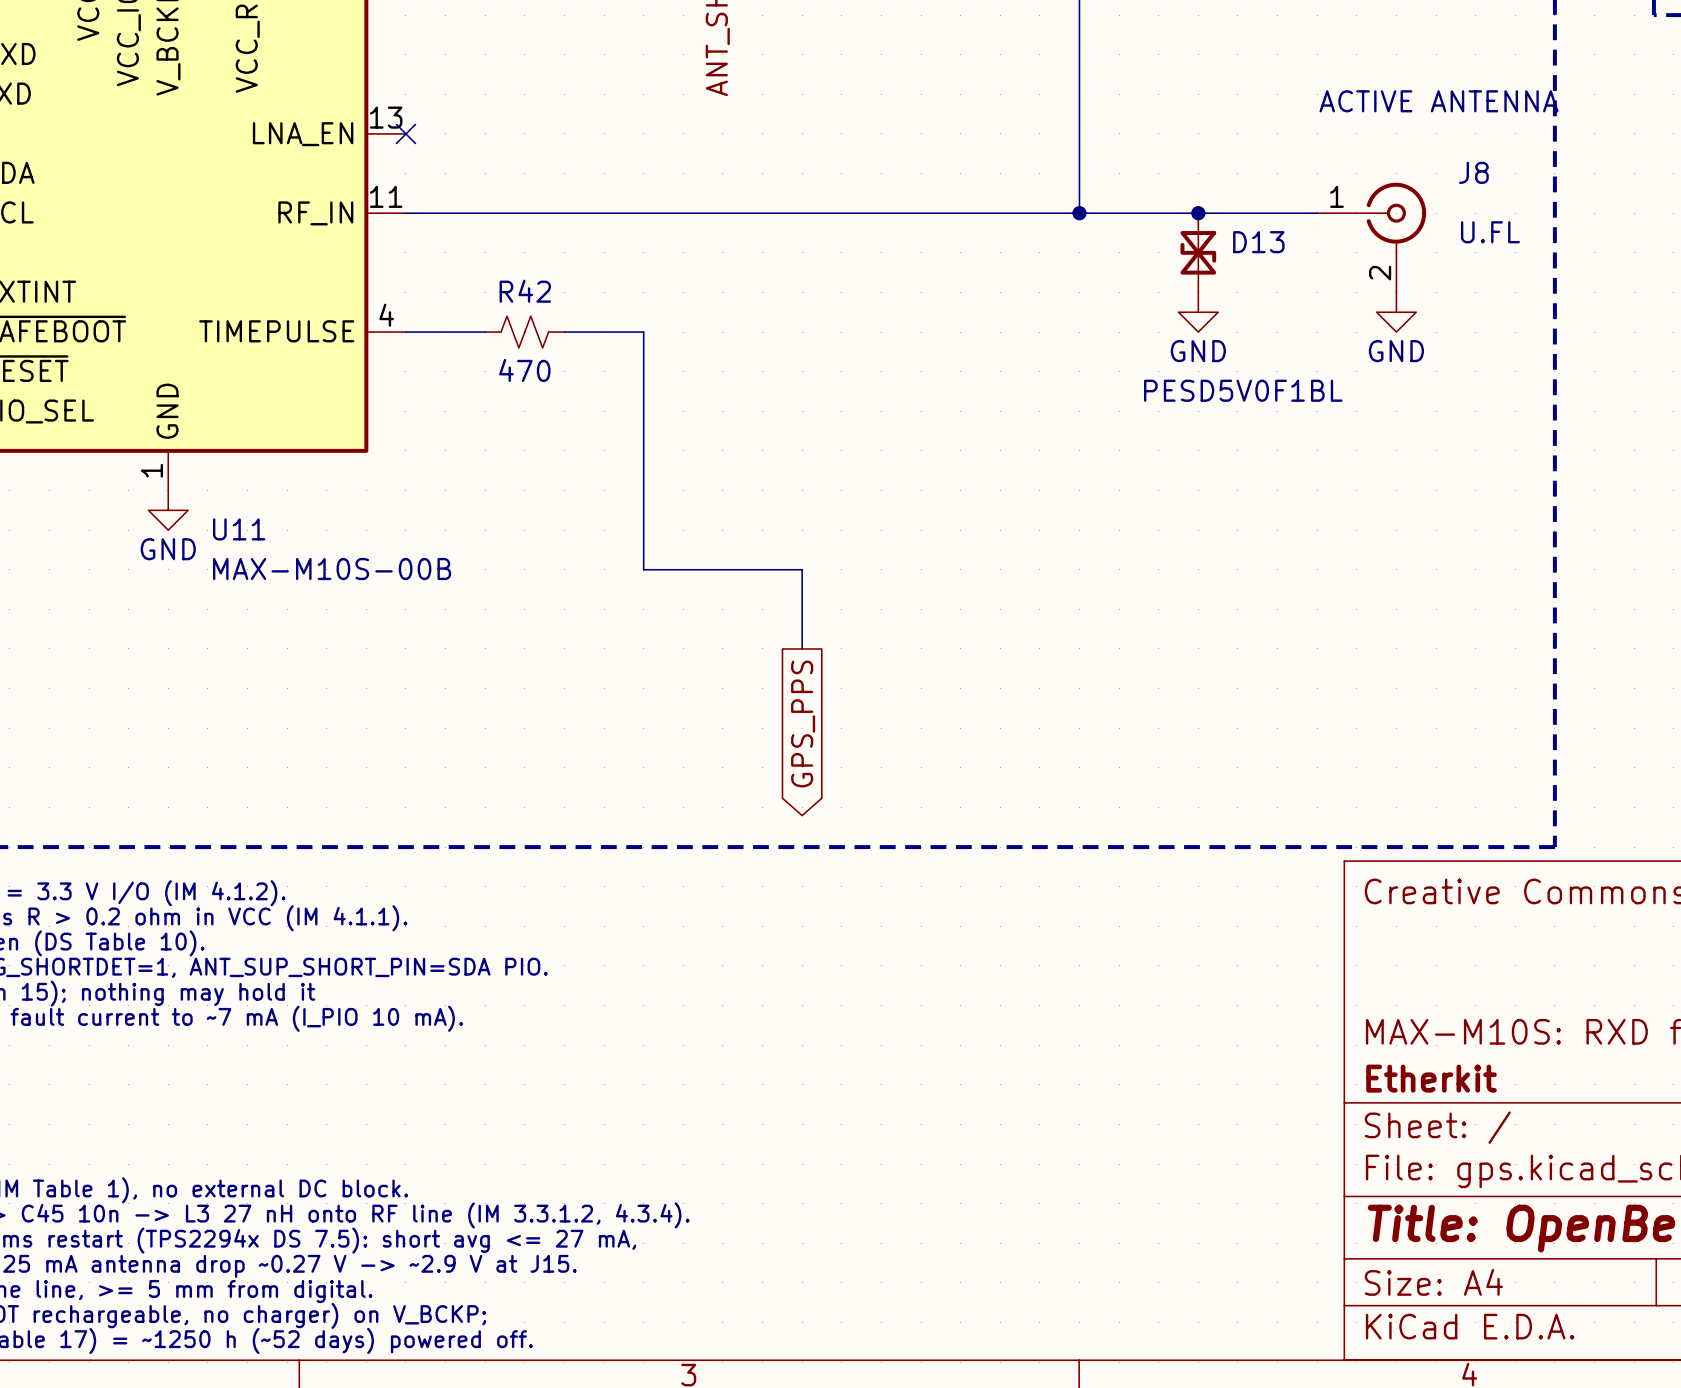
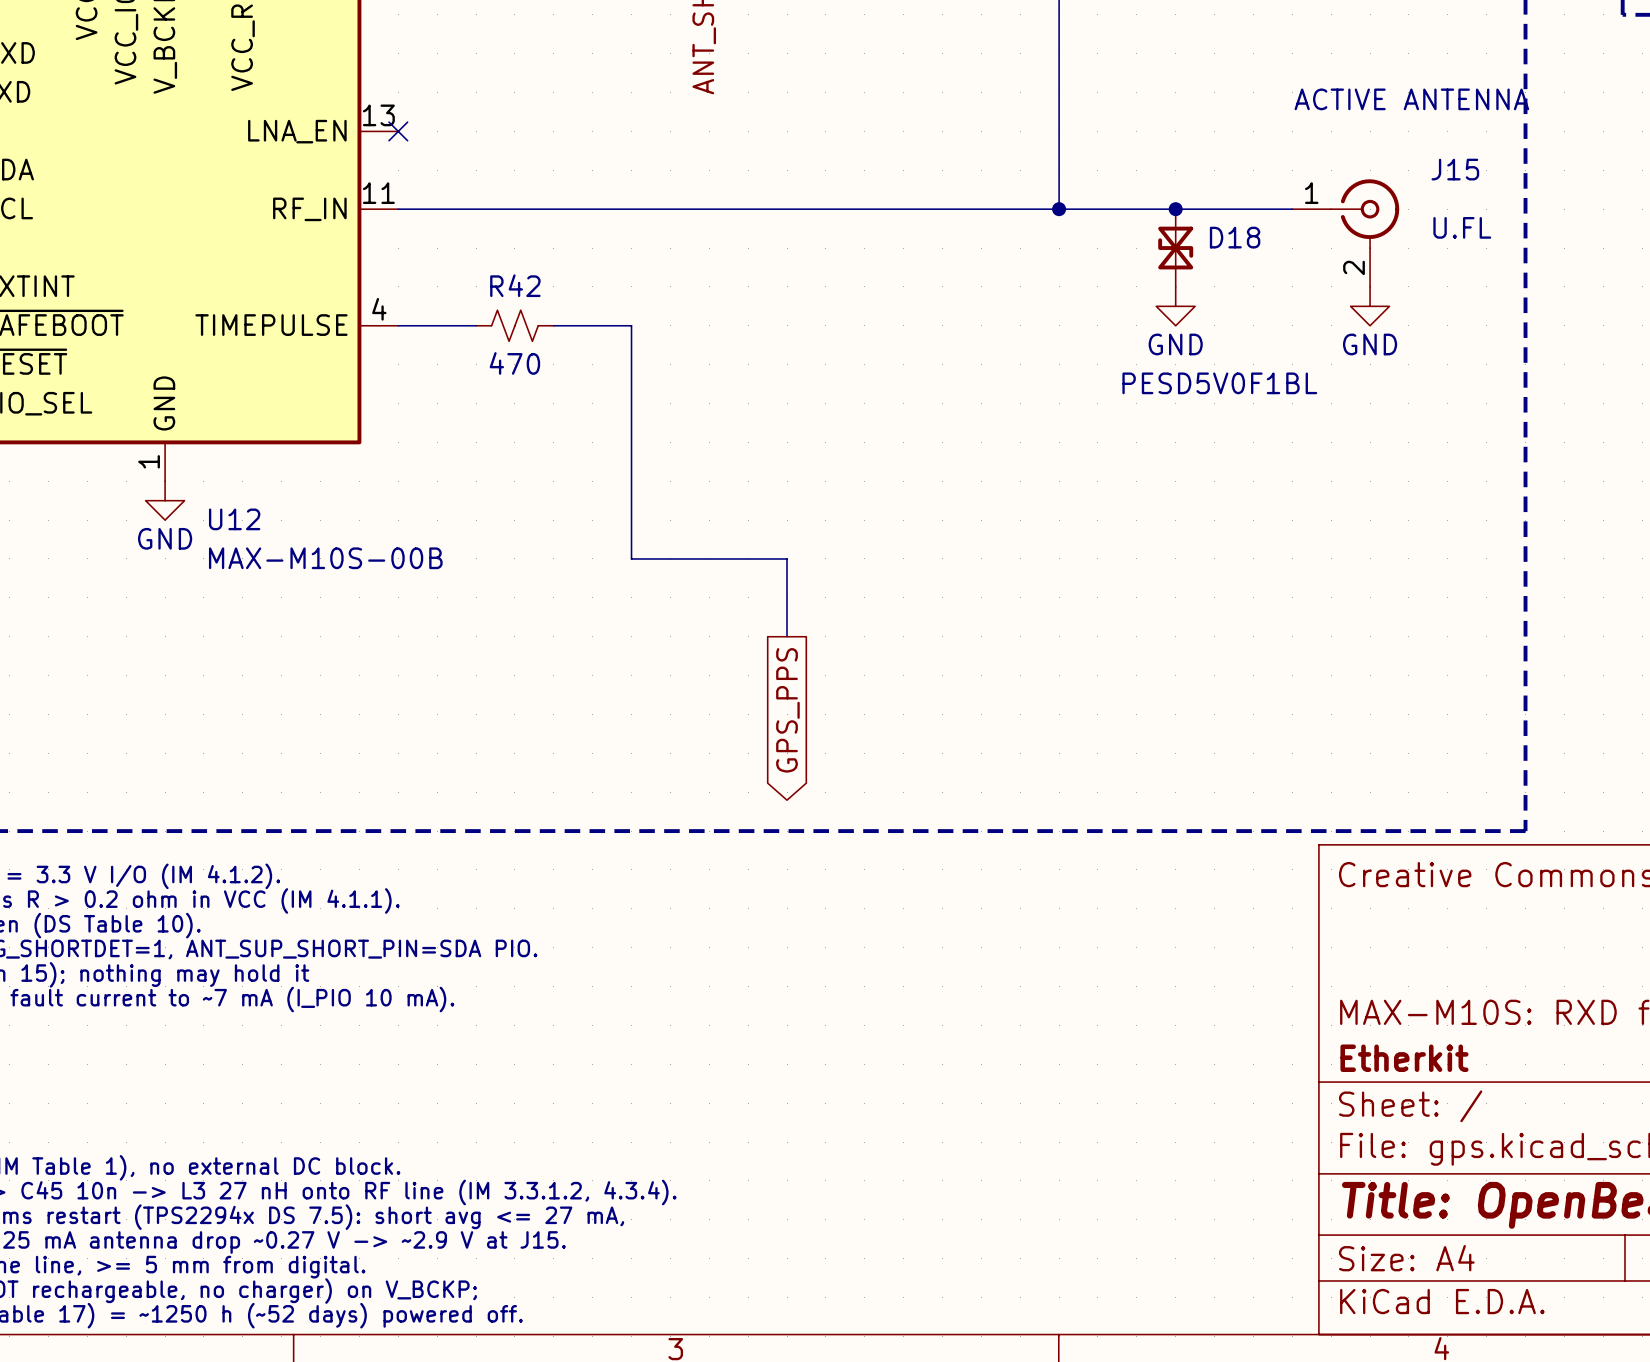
J8 name: J8 (1473, 172) -> J15 (1455, 169)
D13 name: D13 (1258, 242) -> D18 (1235, 237)
U11 name: U11 (239, 529) -> U12 (234, 519)

